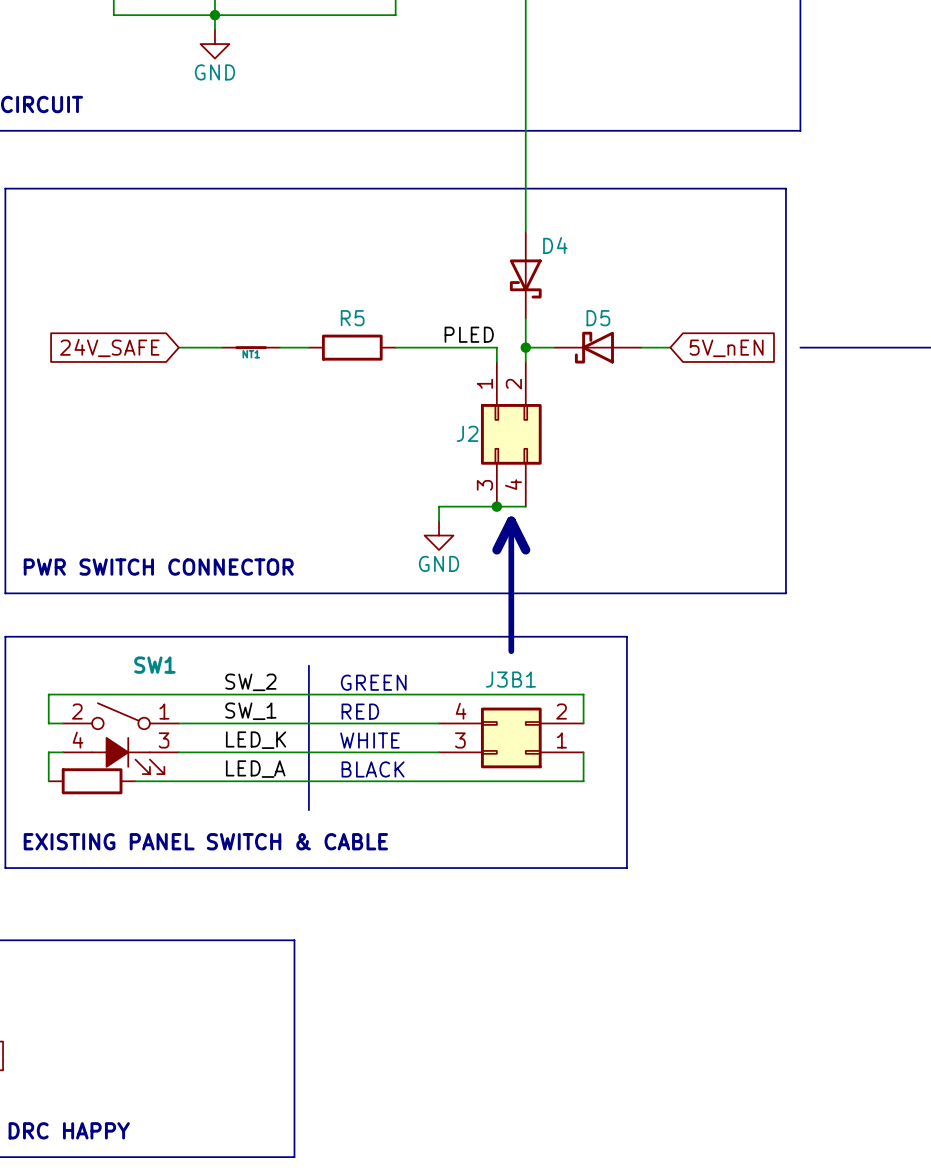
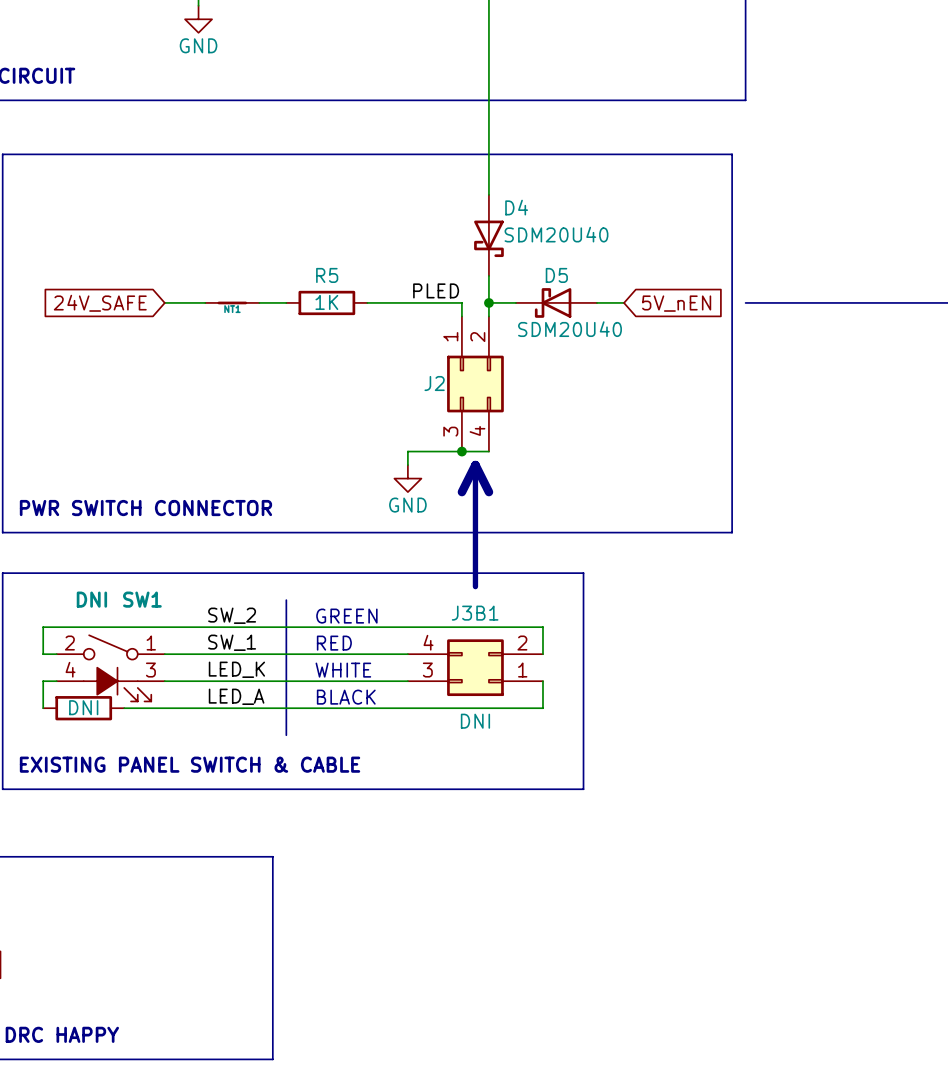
D4 value: none -> SDM20U40 (556, 234)
R5 value: none -> 1K (326, 302)
D5 value: none -> SDM20U40 (570, 329)
SW1 value: none -> DNI (91, 599)
part value: none -> DNI (83, 707)
J3B1 value: none -> DNI (475, 721)

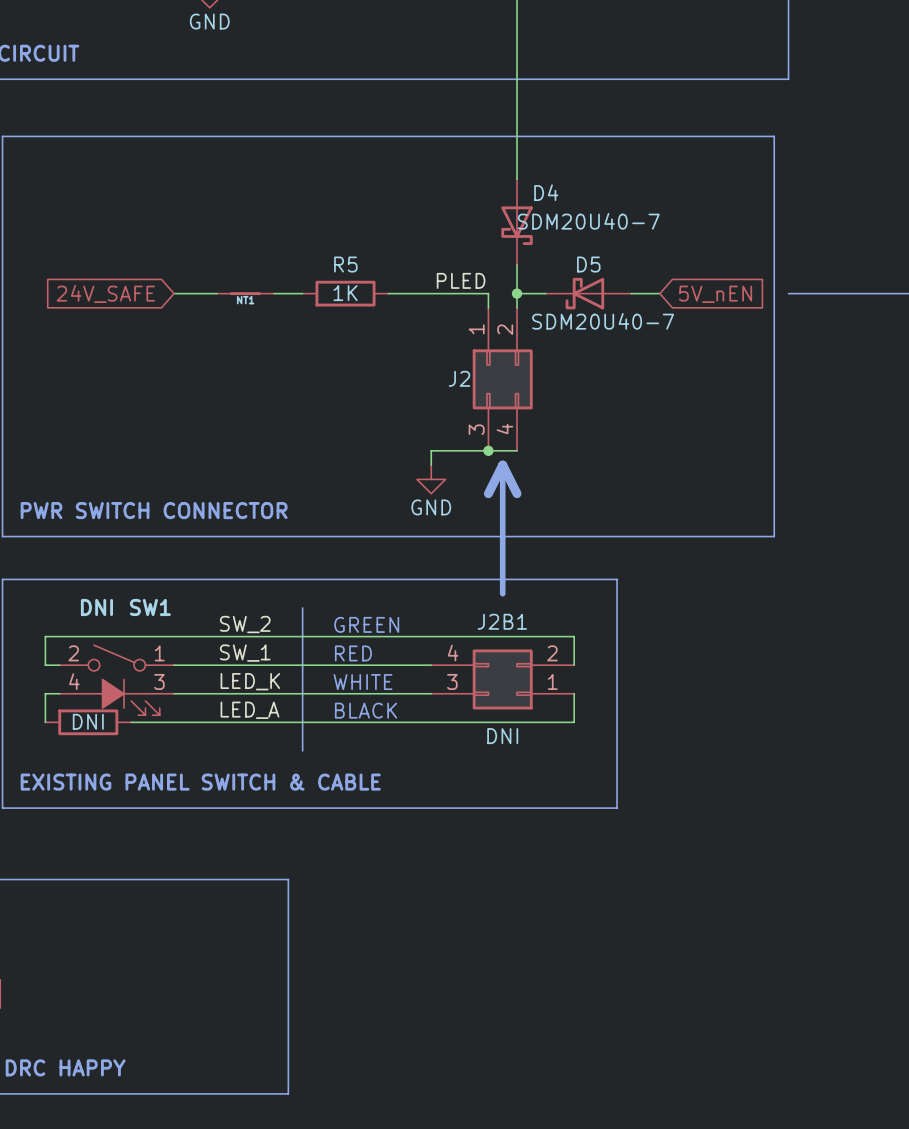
D4 value: SDM20U40 (556, 234) -> SDM20U40-7 (588, 221)
D5 value: SDM20U40 (570, 329) -> SDM20U40-7 (603, 321)
J3B1 name: J3B1 (475, 613) -> J2B1 (502, 621)

